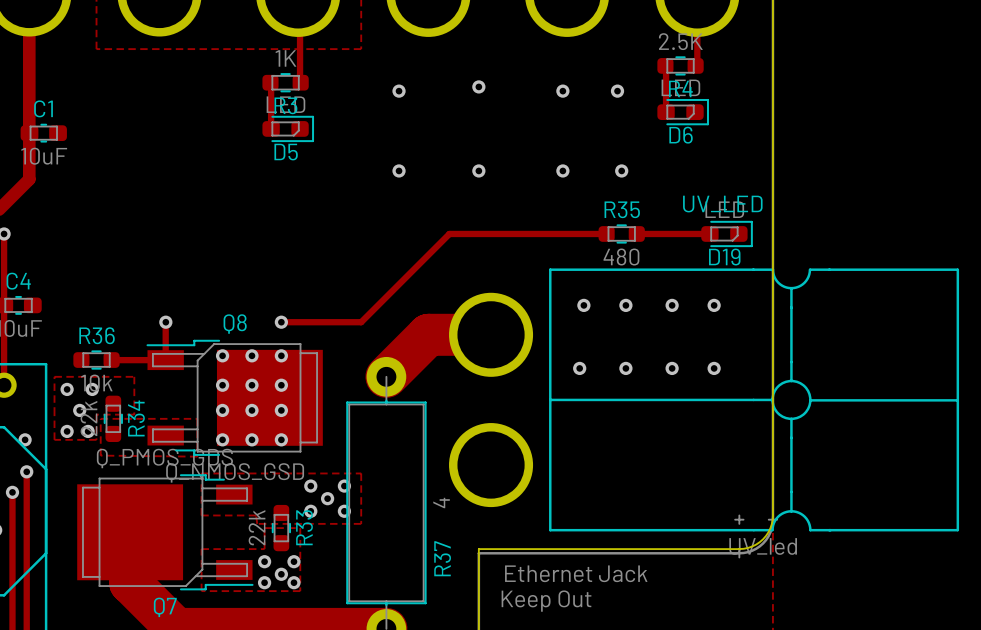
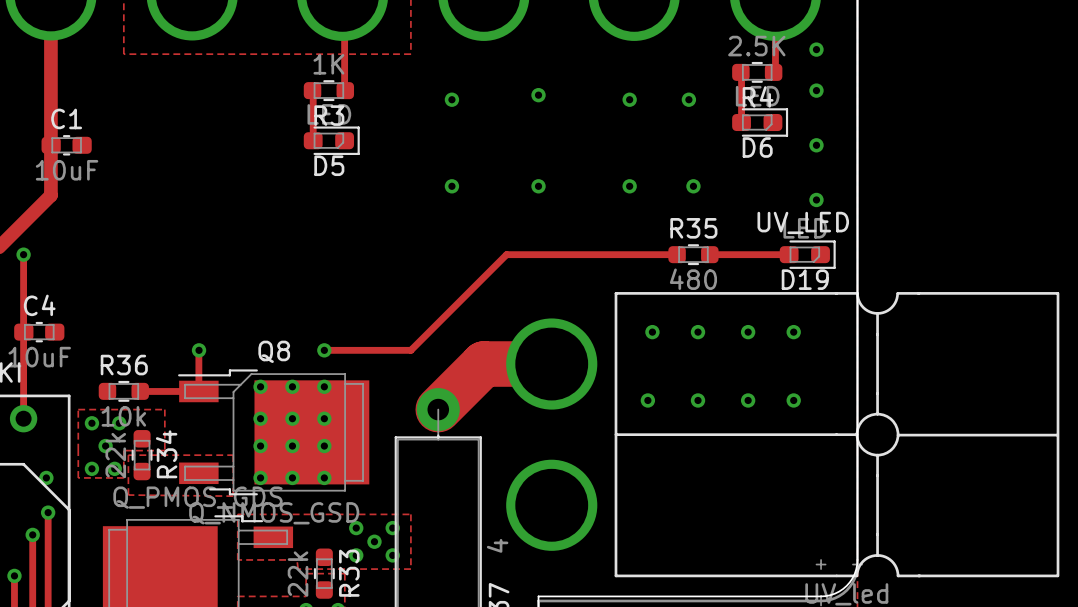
via: none -> (816, 49)
via: none -> (816, 90)
via: none -> (816, 145)
via: none -> (816, 199)

